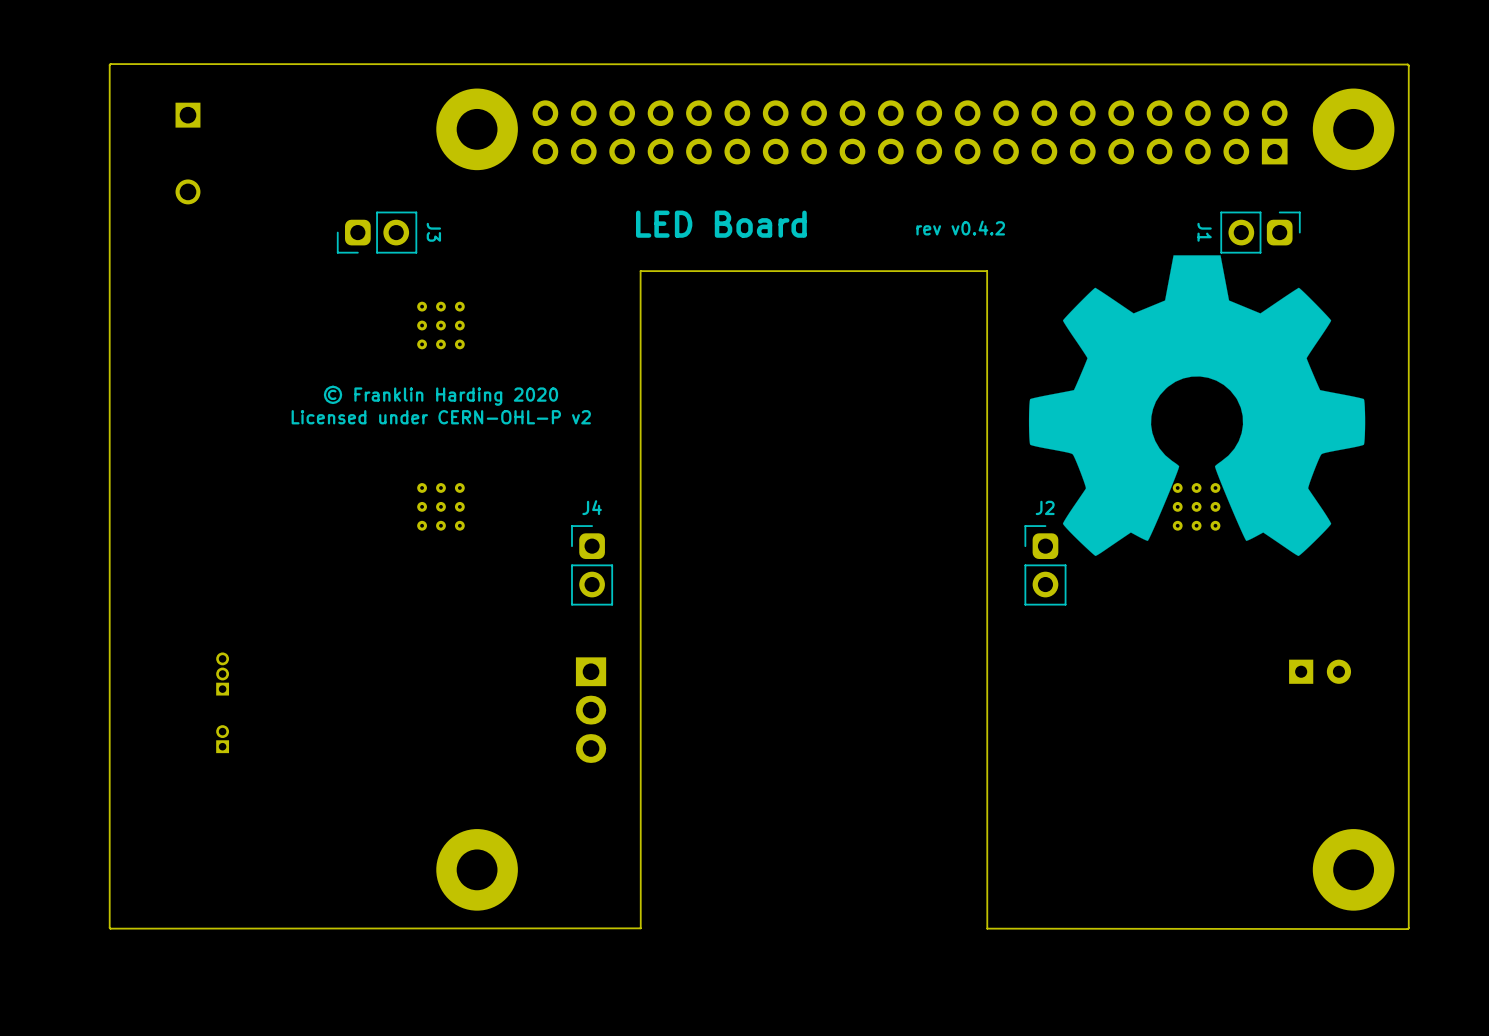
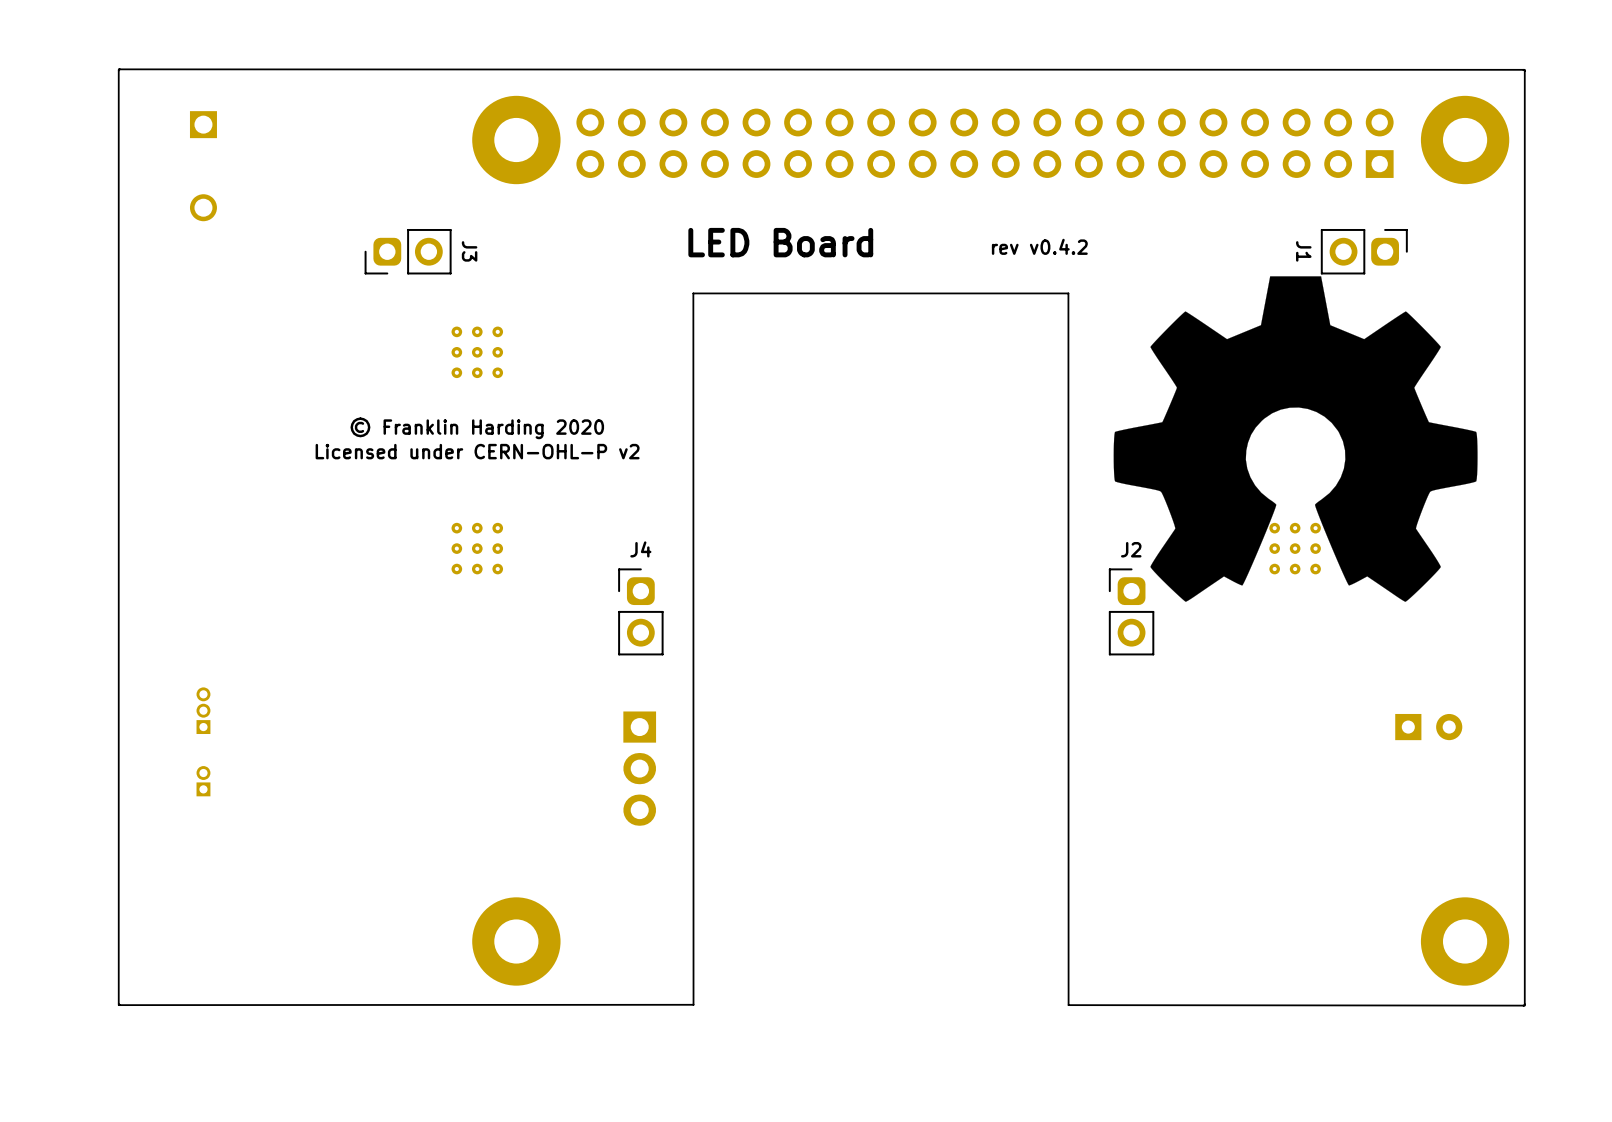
part position: (222, 674) -> (203, 710)
part position: (222, 739) -> (203, 781)

